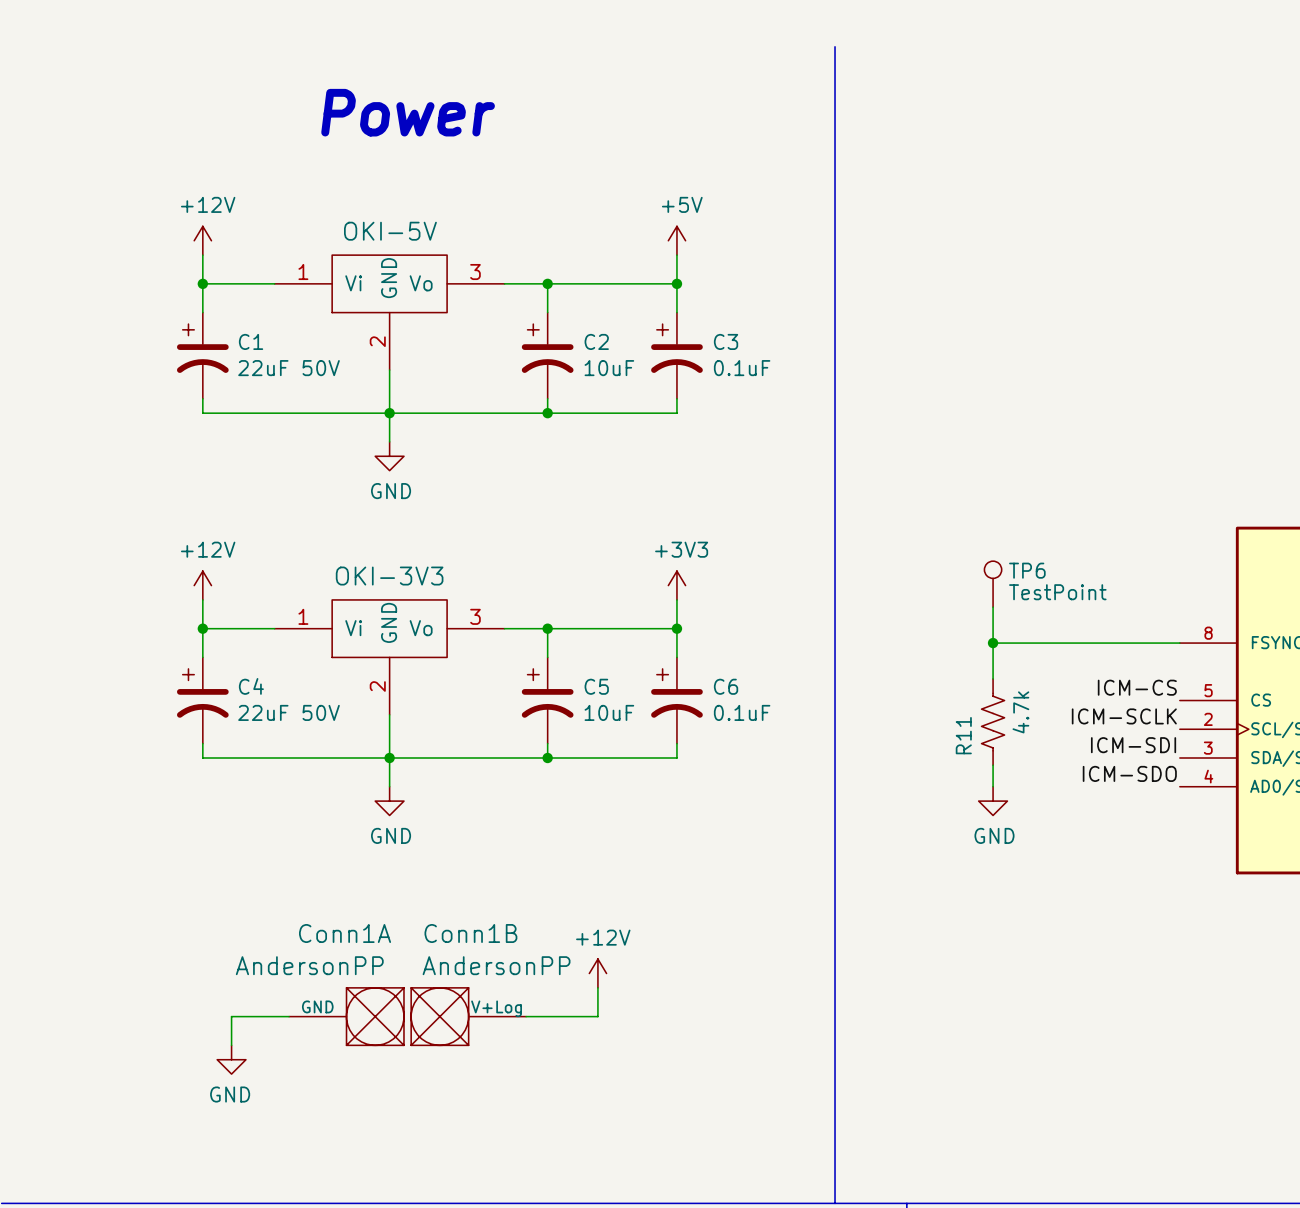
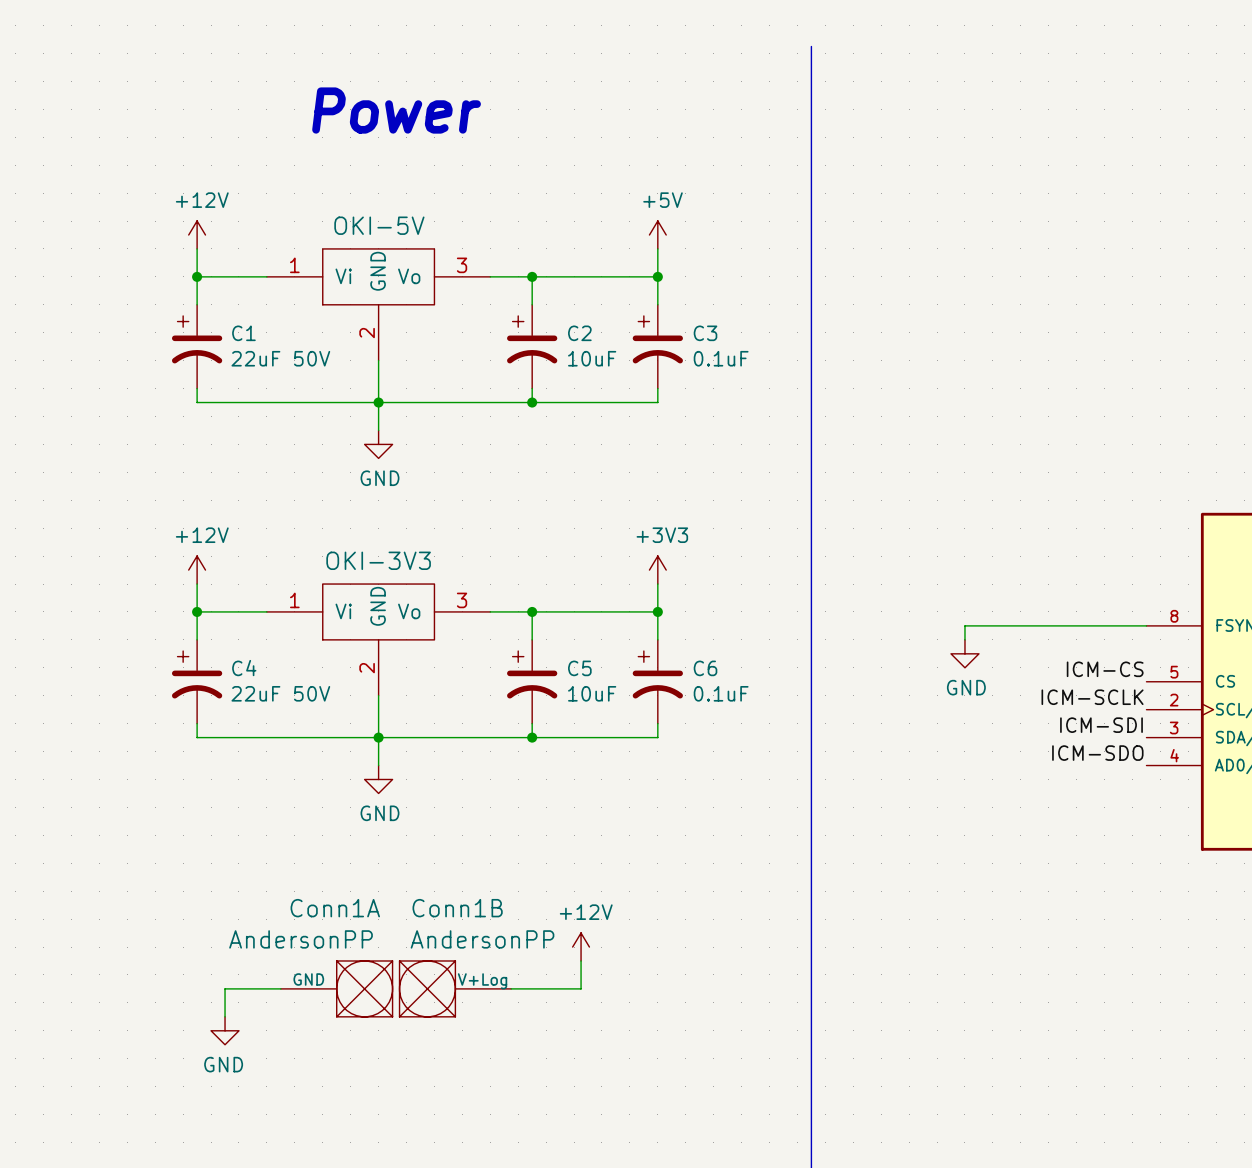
TP6: TestPoint (993, 584) -> none
wire: (993, 607) (993, 643) -> none
junction: (993, 643) -> none
R11: 4.7k (993, 722) -> none
wire: (993, 765) (993, 786) -> none
power symbol position: GND (993, 801) -> GND (964, 653)

